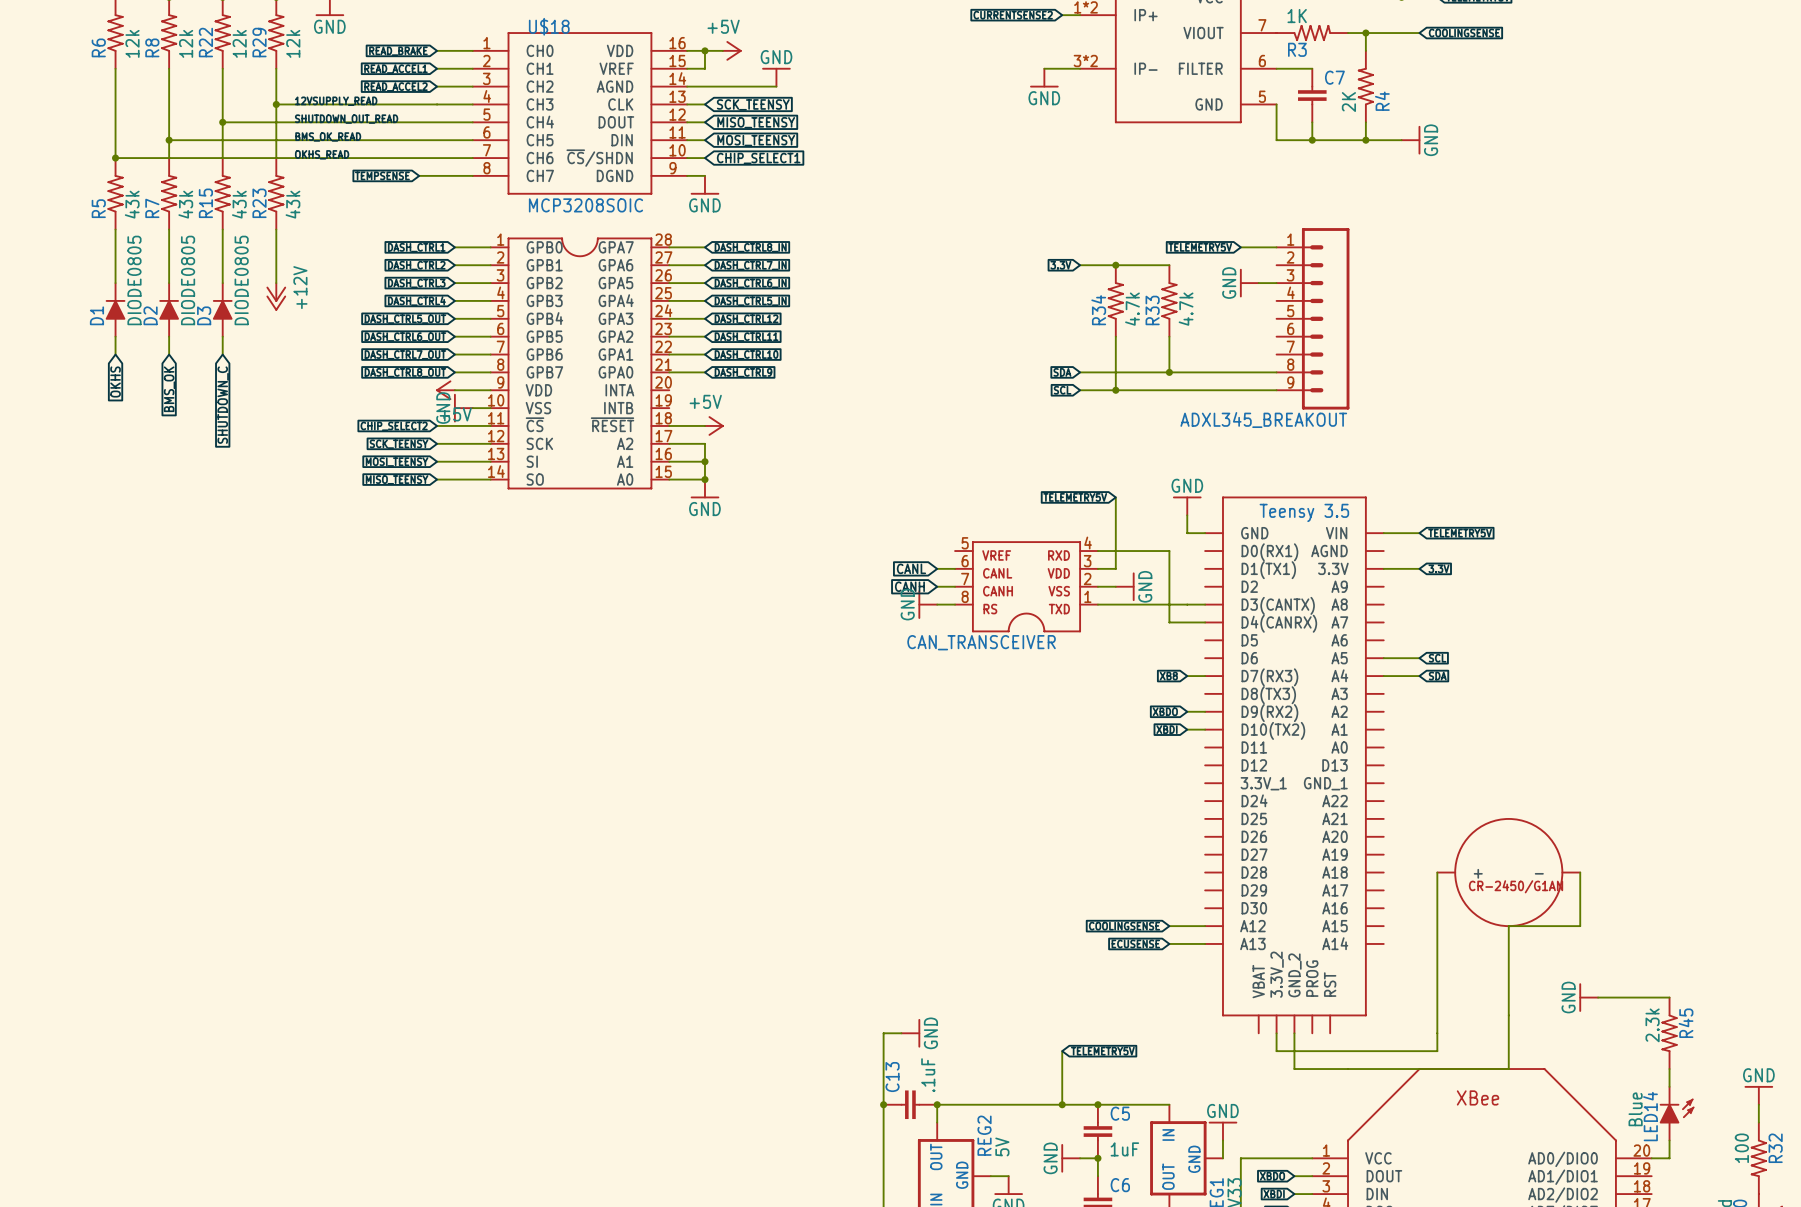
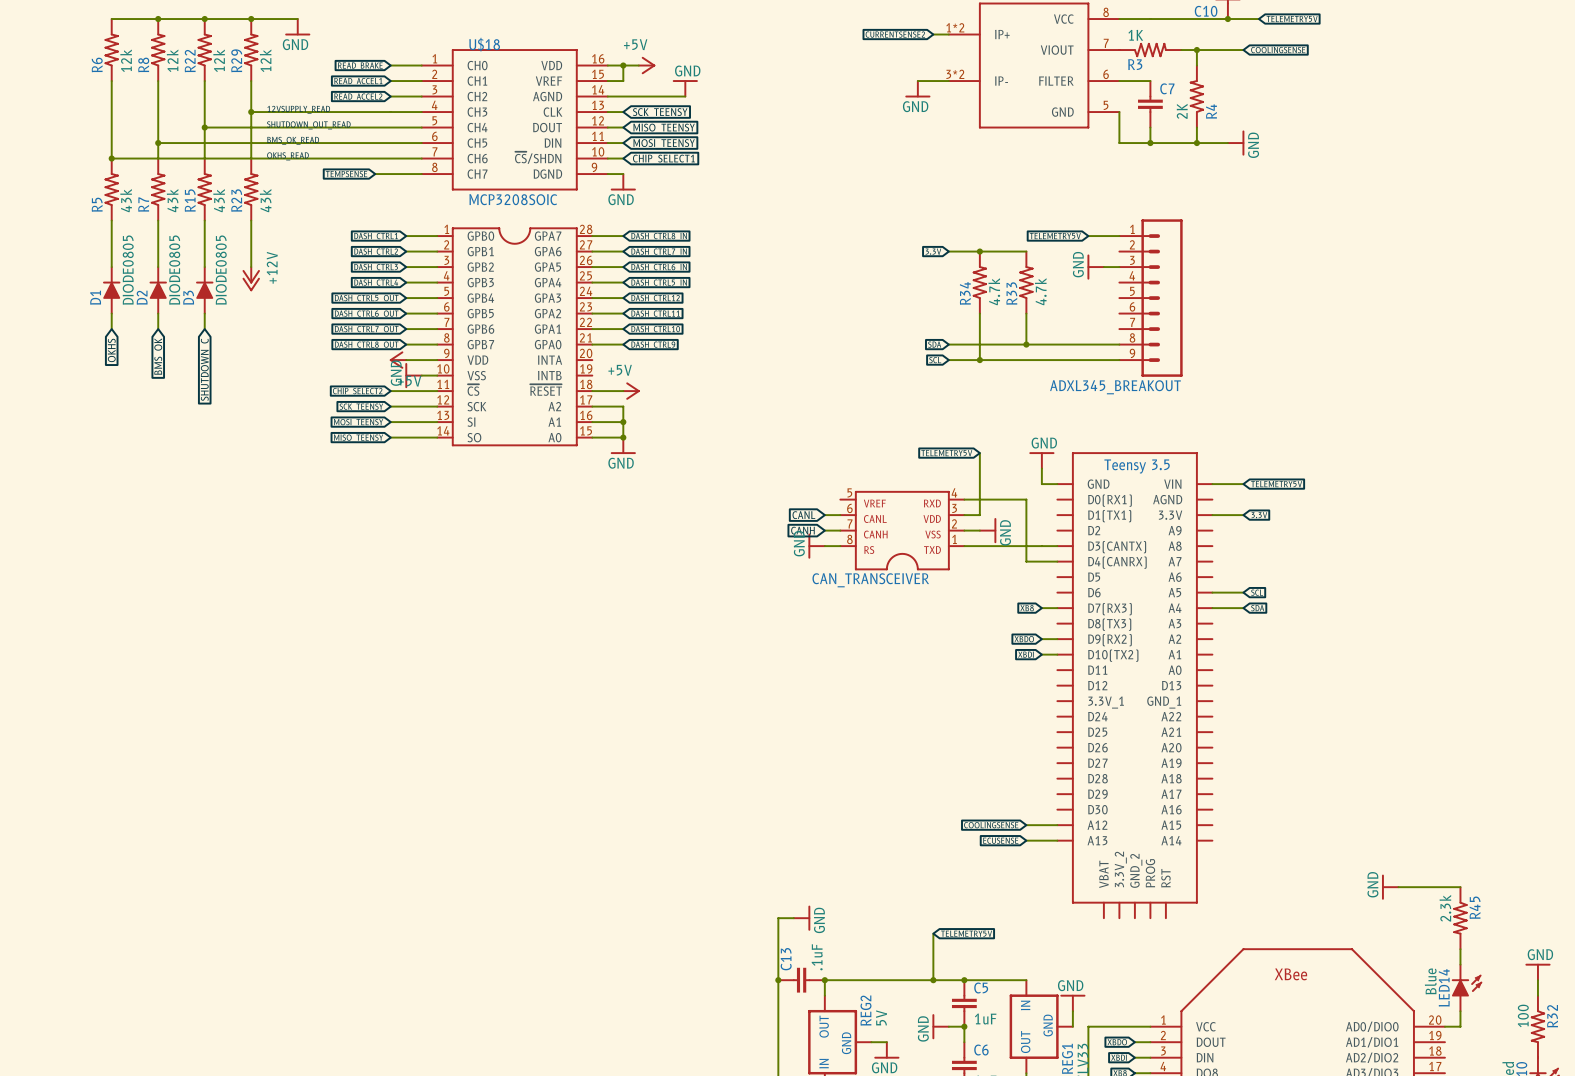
wire: (1437, 872) (1437, 1051) (1276, 1051) (1276, 1033) -> none
part: (1508, 872) -> none
wire: (1580, 872) (1580, 926) (1508, 926) (1508, 1069) (1294, 1069) (1294, 1033) -> none

